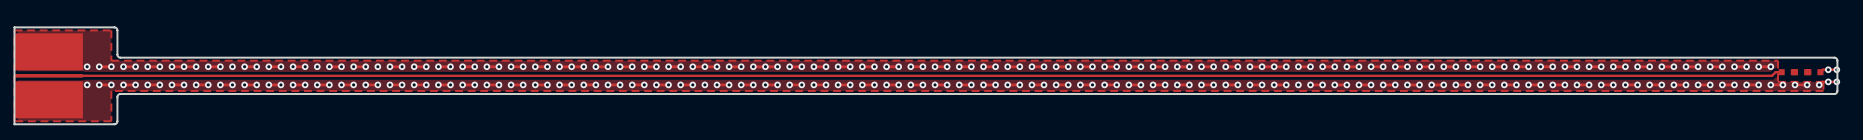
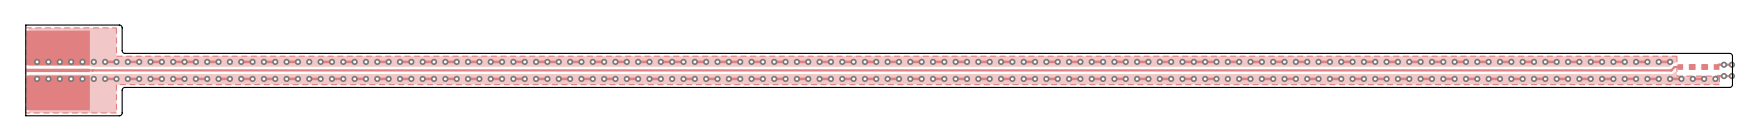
via: none -> (37, 61)
via: none -> (48, 61)
via: none -> (59, 61)
via: none -> (71, 61)
via: none -> (82, 61)
via: none -> (37, 78)
via: none -> (48, 78)
via: none -> (59, 78)
via: none -> (71, 78)
via: none -> (82, 78)

